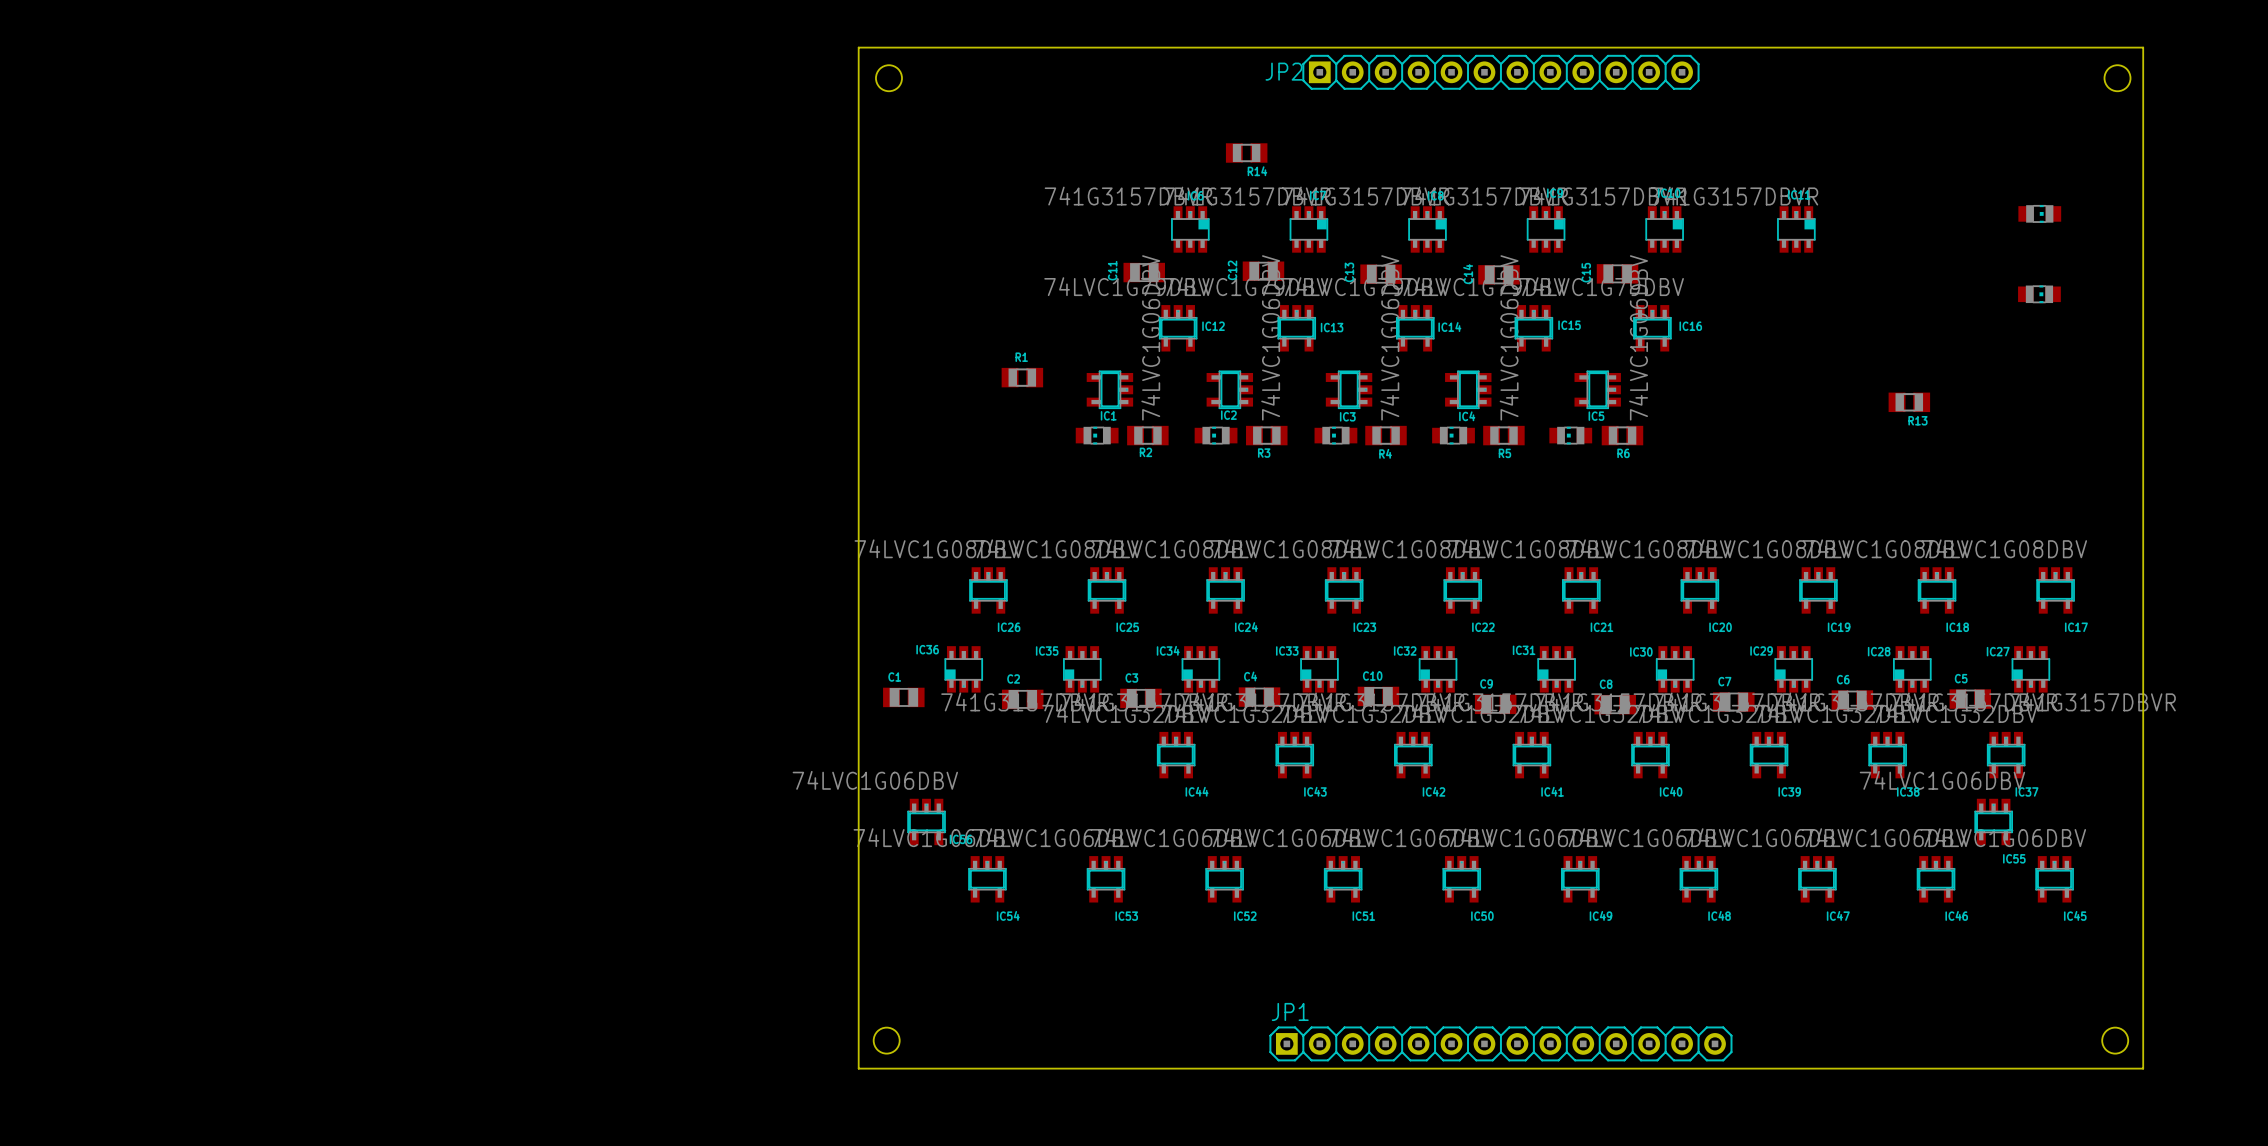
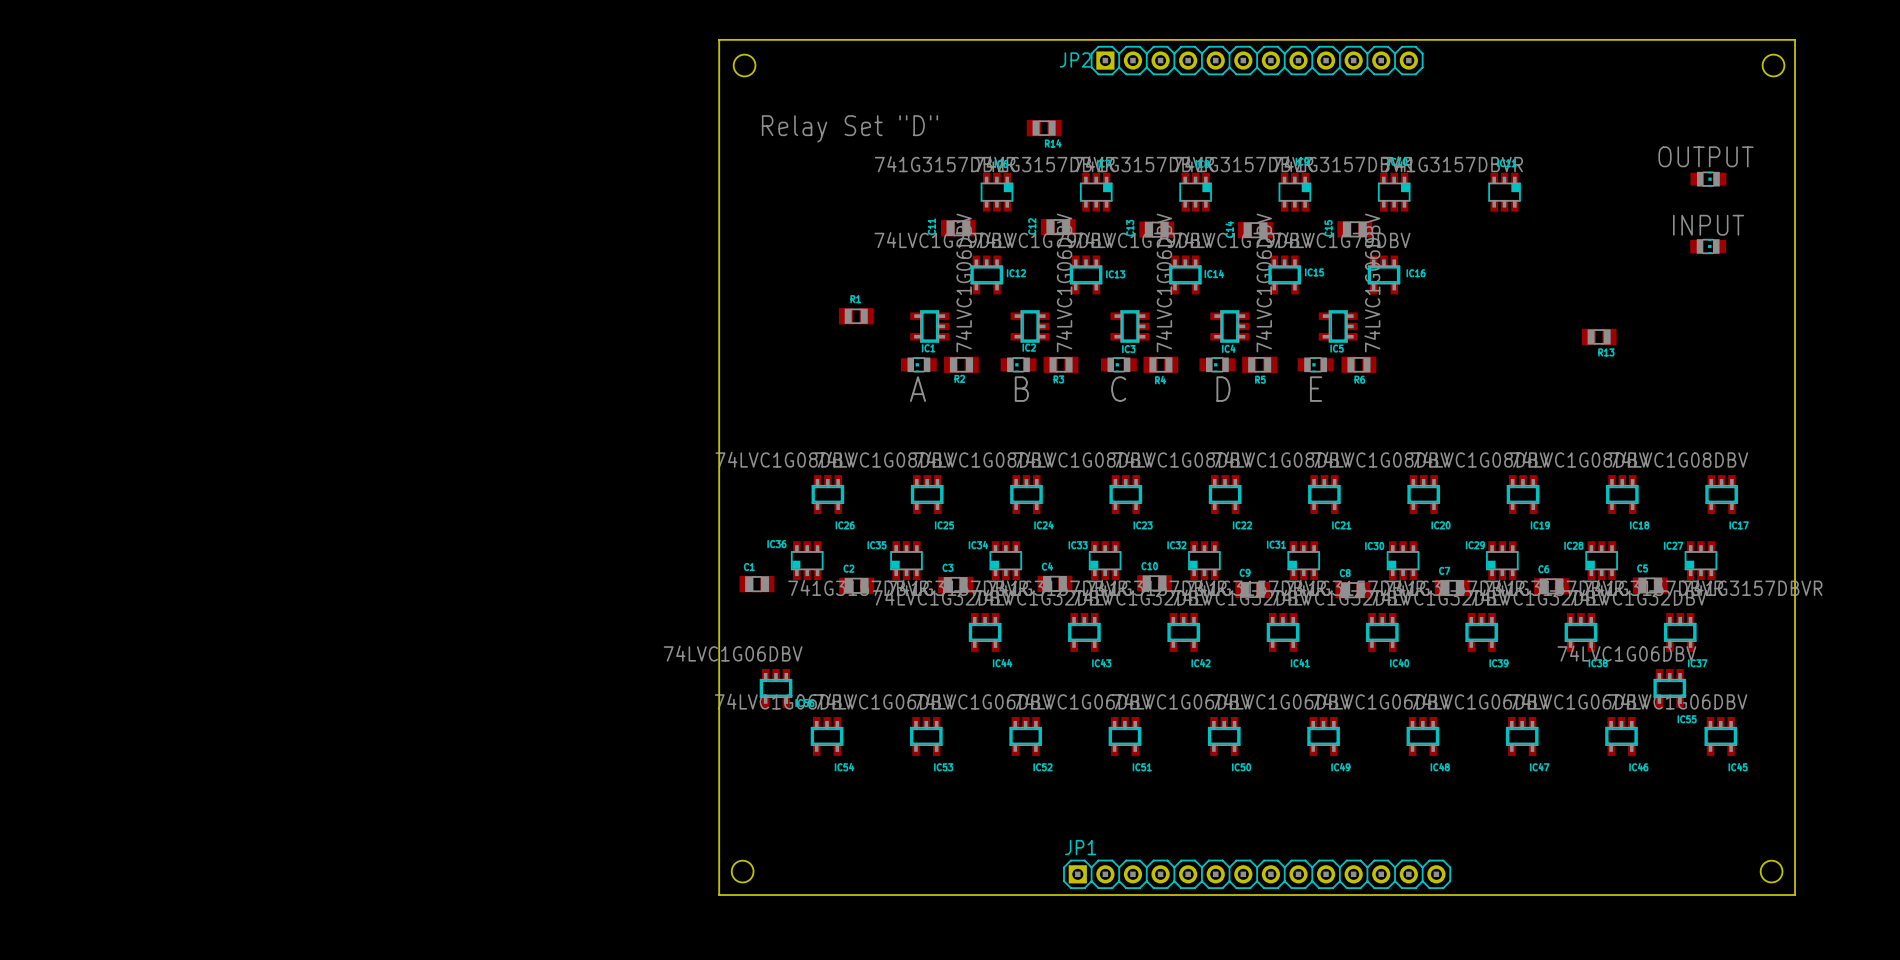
text: none -> Relay Set "D" (849, 128)
text: none -> OUTPUT (1705, 156)
text: none -> INPUT (1708, 225)
text: none -> A (918, 389)
text: none -> B (1021, 389)
text: none -> C (1118, 389)
text: none -> D (1223, 389)
text: none -> E (1315, 389)

